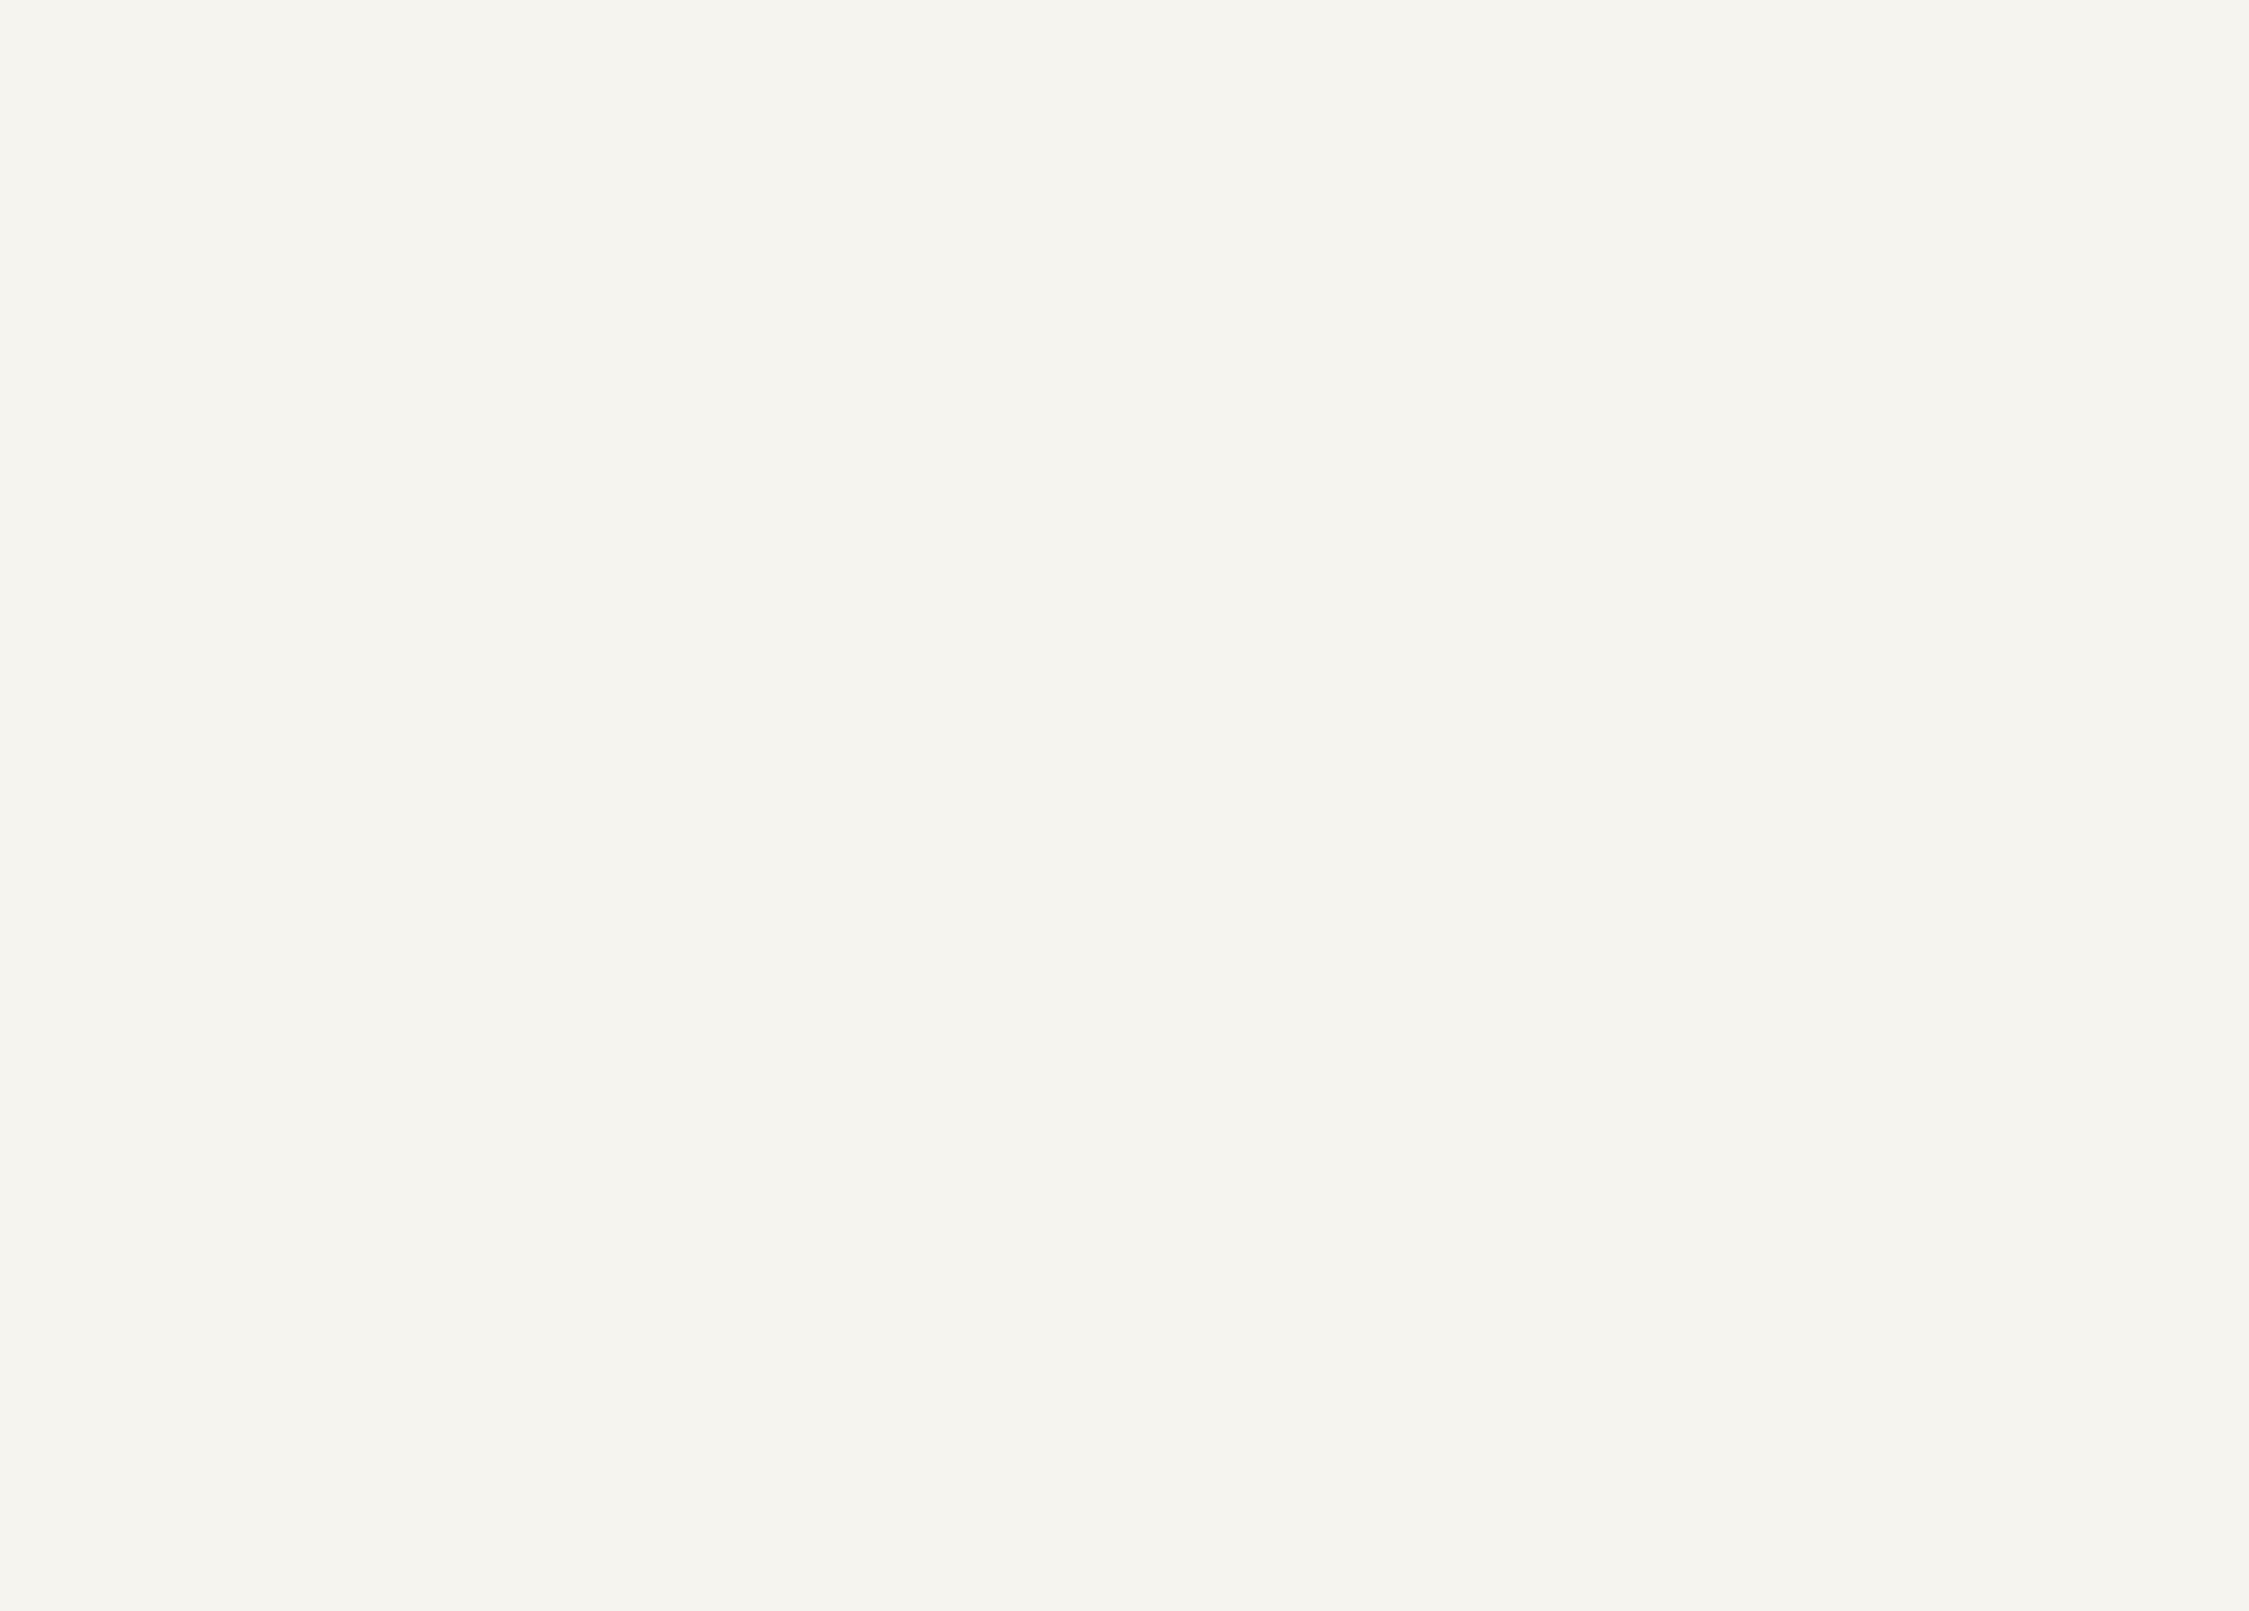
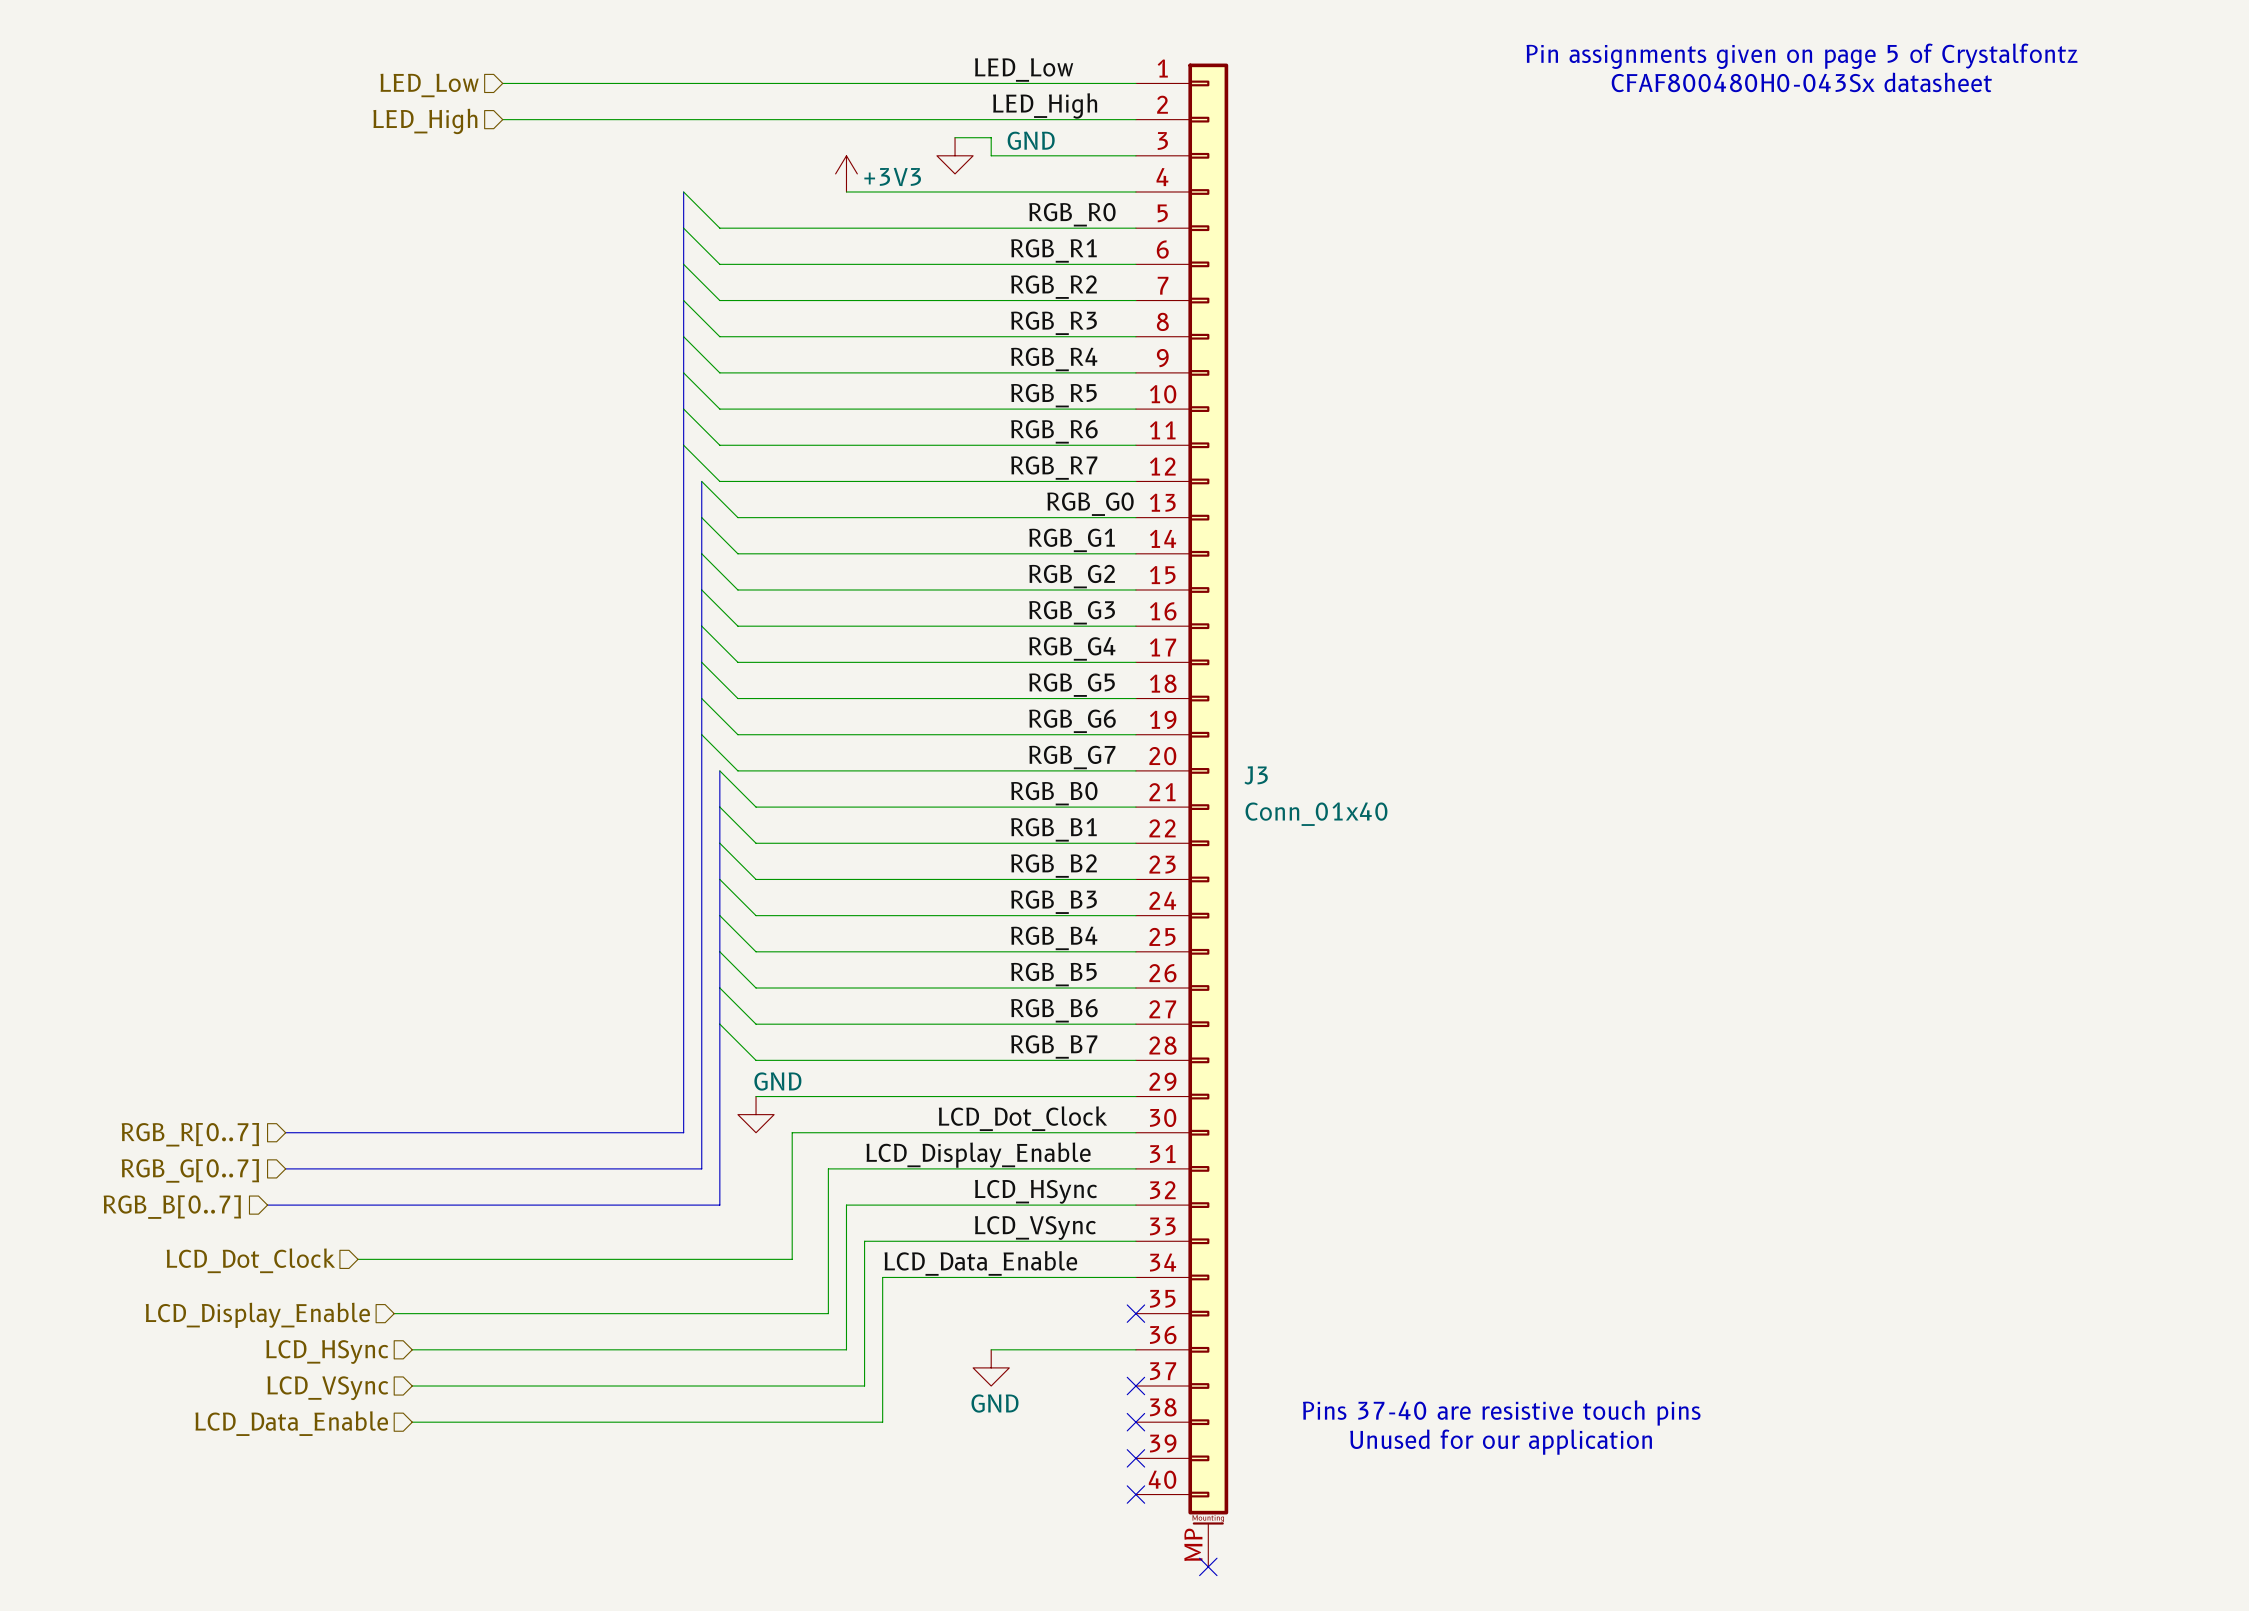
text: none -> Pin assignments given on page 5 of Crystalfontz (1802, 56)
label: none -> LED_Low (1024, 70)
text: none -> CFAF800480H0-043Sx datasheet (1801, 82)
wire: none -> (502, 83) (1135, 83)
hierarchical label: none -> LED_Low (429, 85)
label: none -> LED_High (1045, 105)
wire: none -> (502, 119) (1135, 119)
hierarchical label: none -> LED_High (425, 121)
wire: none -> (955, 137) (991, 137) (991, 155) (1135, 155)
power symbol: none -> GND (955, 155)
power symbol: none -> +3V3 (846, 173)
wire: none -> (683, 191) (719, 228) (1135, 228)
bus: none -> (683, 191) (683, 1132) (285, 1132)
wire: none -> (846, 191) (1135, 191)
label: none -> RGB_R0 (1072, 214)
wire: none -> (683, 228) (719, 264) (1135, 264)
label: none -> RGB_R1 (1053, 250)
wire: none -> (683, 264) (719, 300) (1135, 300)
label: none -> RGB_R2 (1053, 287)
wire: none -> (683, 300) (719, 336) (1135, 336)
label: none -> RGB_R3 (1054, 323)
wire: none -> (683, 336) (719, 372) (1135, 372)
label: none -> RGB_R4 (1054, 359)
wire: none -> (683, 372) (719, 409) (1135, 409)
label: none -> RGB_R5 (1053, 395)
wire: none -> (683, 409) (719, 445) (1135, 445)
label: none -> RGB_R6 (1054, 431)
wire: none -> (683, 445) (719, 481) (1135, 481)
label: none -> RGB_R7 (1054, 468)
wire: none -> (701, 481) (737, 517) (1135, 517)
bus: none -> (701, 481) (701, 1168) (285, 1168)
label: none -> RGB_G0 (1090, 504)
wire: none -> (701, 517) (737, 553) (1135, 553)
label: none -> RGB_G1 (1072, 540)
wire: none -> (701, 553) (737, 589) (1135, 589)
label: none -> RGB_G2 (1072, 576)
wire: none -> (701, 589) (737, 626) (1135, 626)
label: none -> RGB_G3 (1072, 612)
wire: none -> (701, 626) (737, 662) (1135, 662)
label: none -> RGB_G4 (1072, 648)
wire: none -> (701, 662) (737, 698) (1135, 698)
label: none -> RGB_G5 (1072, 685)
wire: none -> (701, 698) (737, 734) (1135, 734)
label: none -> RGB_G6 (1072, 721)
wire: none -> (701, 734) (737, 770) (1135, 770)
label: none -> RGB_G7 (1072, 757)
wire: none -> (719, 770) (756, 807) (1135, 807)
bus: none -> (719, 770) (719, 1205) (267, 1205)
label: none -> RGB_B0 (1054, 793)
wire: none -> (719, 807) (756, 843) (1135, 843)
J3: none -> Conn_01x40 (1182, 815)
label: none -> RGB_B1 (1053, 829)
wire: none -> (719, 843) (756, 879) (1135, 879)
label: none -> RGB_B2 (1053, 866)
wire: none -> (719, 879) (756, 915) (1135, 915)
label: none -> RGB_B3 (1054, 902)
wire: none -> (719, 915) (756, 951) (1135, 951)
label: none -> RGB_B4 (1054, 938)
wire: none -> (719, 951) (756, 988) (1135, 988)
label: none -> RGB_B5 (1053, 974)
wire: none -> (719, 988) (756, 1024) (1135, 1024)
label: none -> RGB_B6 (1054, 1010)
wire: none -> (719, 1024) (756, 1060) (1135, 1060)
label: none -> RGB_B7 (1054, 1046)
wire: none -> (756, 1096) (1135, 1096)
power symbol: none -> GND (756, 1114)
label: none -> LCD_Dot_Clock (1022, 1118)
wire: none -> (1135, 1132) (792, 1132) (792, 1259) (358, 1259)
hierarchical label: none -> RGB_R[0..7] (190, 1134)
label: none -> LCD_Display_Enable (978, 1155)
wire: none -> (1135, 1168) (828, 1168) (828, 1313) (394, 1313)
hierarchical label: none -> RGB_G[0..7] (190, 1170)
label: none -> LCD_HSync (1035, 1191)
wire: none -> (1135, 1205) (846, 1205) (846, 1349) (412, 1349)
hierarchical label: none -> RGB_B[0..7] (172, 1207)
label: none -> LCD_VSync (1035, 1227)
wire: none -> (1135, 1241) (864, 1241) (864, 1386) (412, 1386)
hierarchical label: none -> LCD_Dot_Clock (250, 1260)
label: none -> LCD_Data_Enable (980, 1263)
wire: none -> (1135, 1277) (882, 1277) (882, 1422) (412, 1422)
no-connect mark: none -> (1135, 1313)
hierarchical label: none -> LCD_Display_Enable (257, 1315)
wire: none -> (991, 1349) (1135, 1349)
hierarchical label: none -> LCD_HSync (327, 1352)
power symbol: none -> GND (991, 1367)
no-connect mark: none -> (1135, 1386)
hierarchical label: none -> LCD_VSync (327, 1388)
text: none -> Pins 37-40 are resistive touch pins (1501, 1413)
no-connect mark: none -> (1135, 1422)
hierarchical label: none -> LCD_Data_Enable (291, 1423)
text: none -> Unused for our application (1501, 1442)
no-connect mark: none -> (1135, 1458)
no-connect mark: none -> (1135, 1494)
no-connect mark: none -> (1208, 1566)

